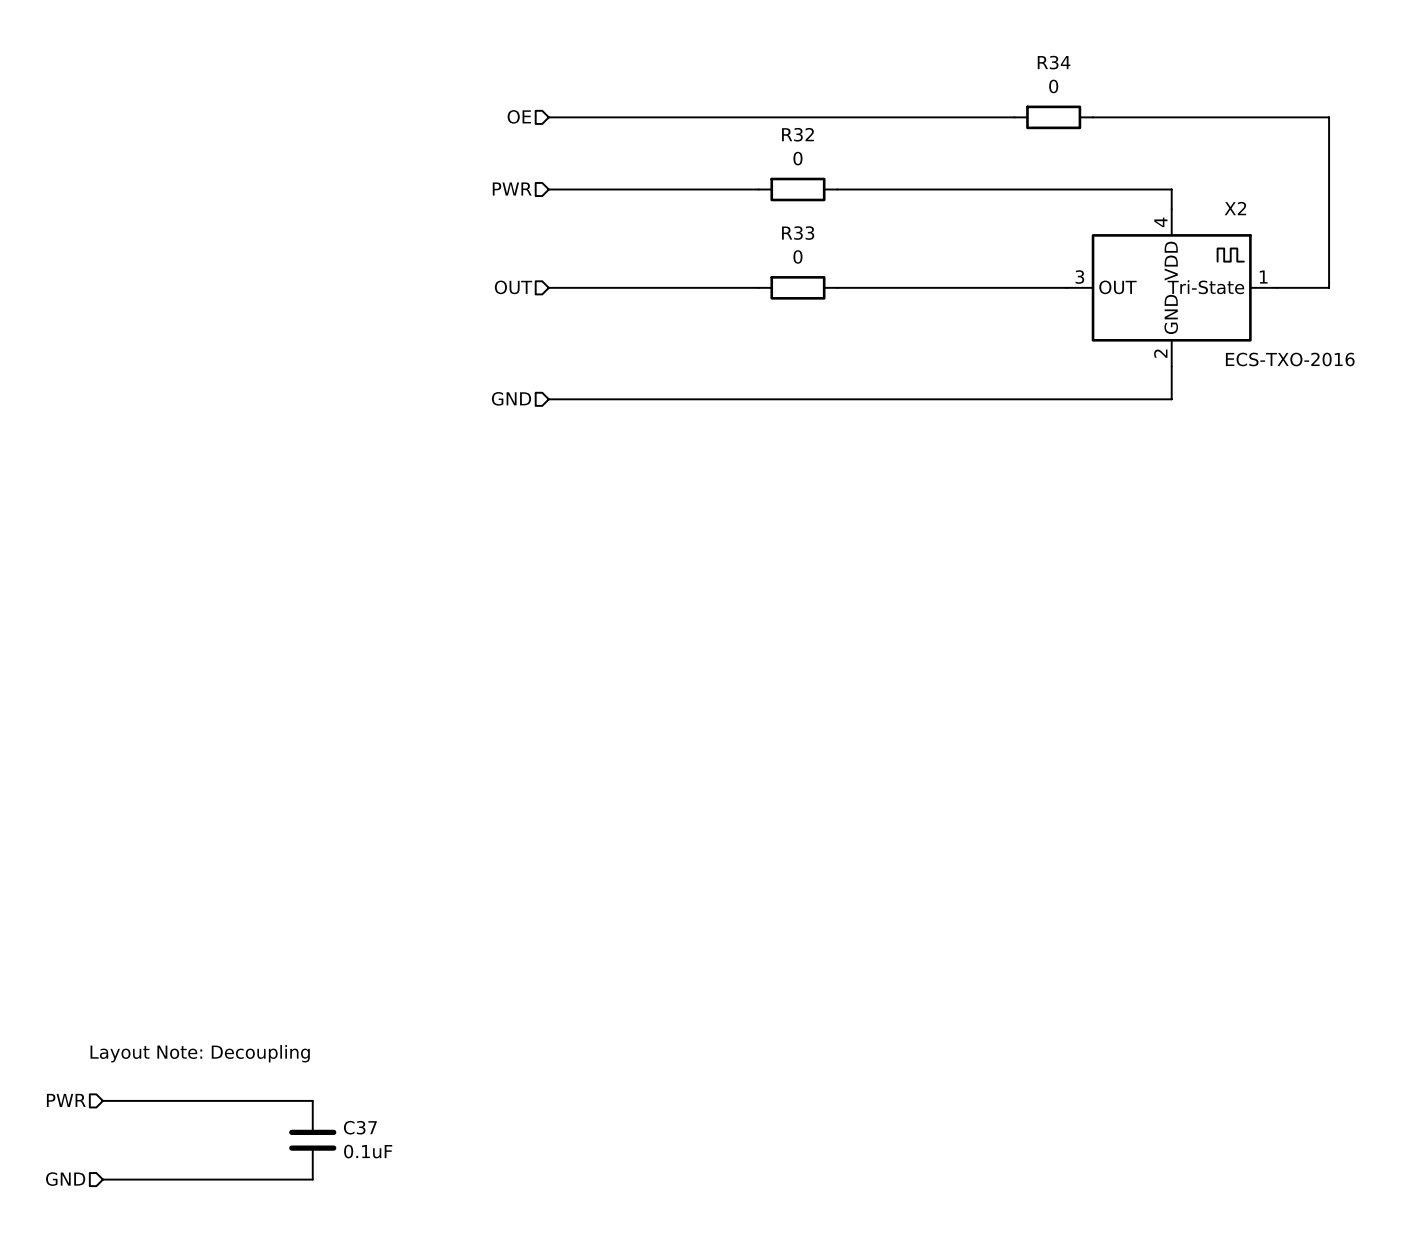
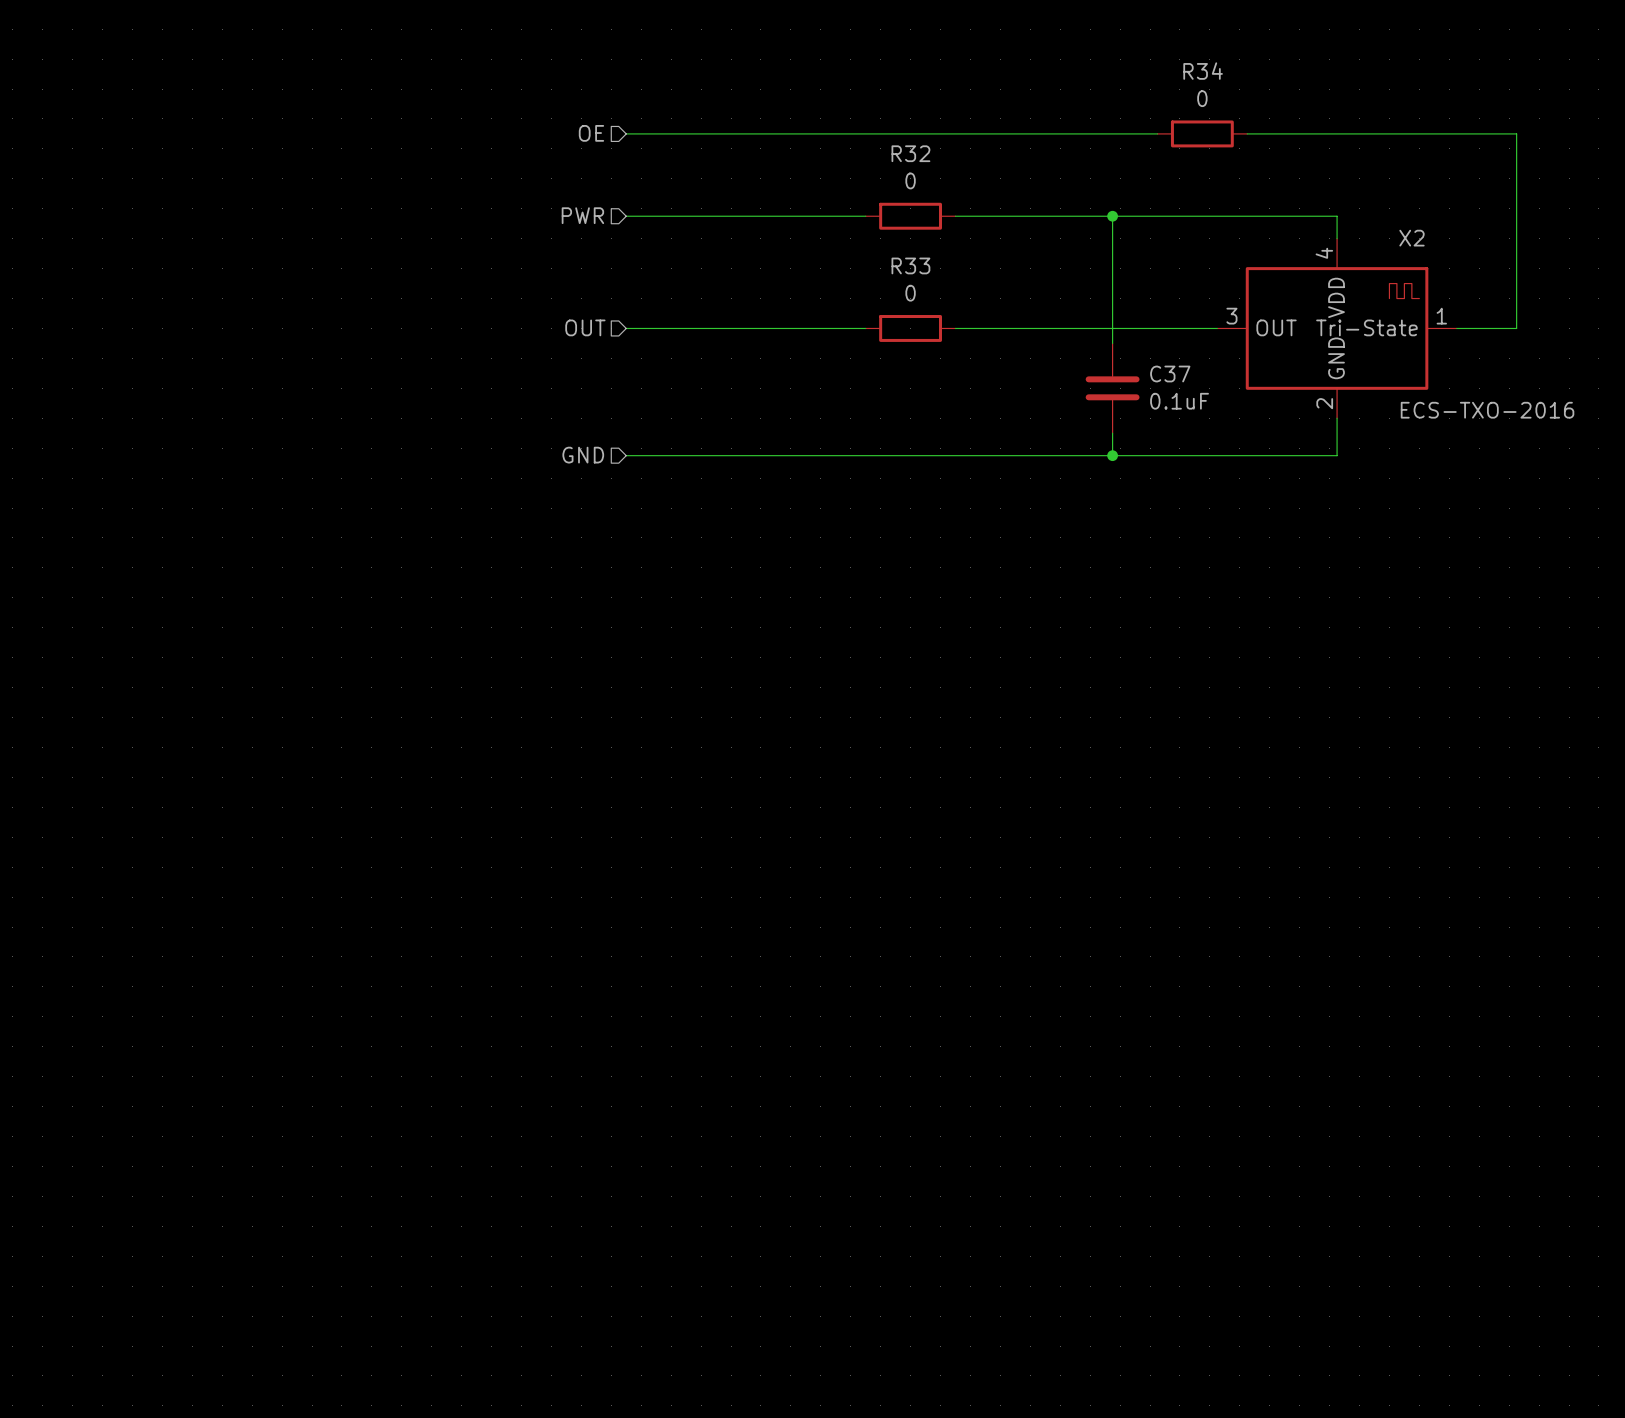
wire: none -> (1112, 216) (1112, 343)
junction: none -> (1112, 216)
wire: none -> (1112, 433) (1112, 455)
junction: none -> (1112, 455)
text: Layout Note: Decoupling (200, 1053) -> none
hierarchical label: PWR (66, 1100) -> none
wire: (102, 1100) (312, 1100) -> none
C37 position: (312, 1140) -> (1112, 388)
hierarchical label: GND (65, 1179) -> none
wire: (102, 1179) (312, 1179) -> none

